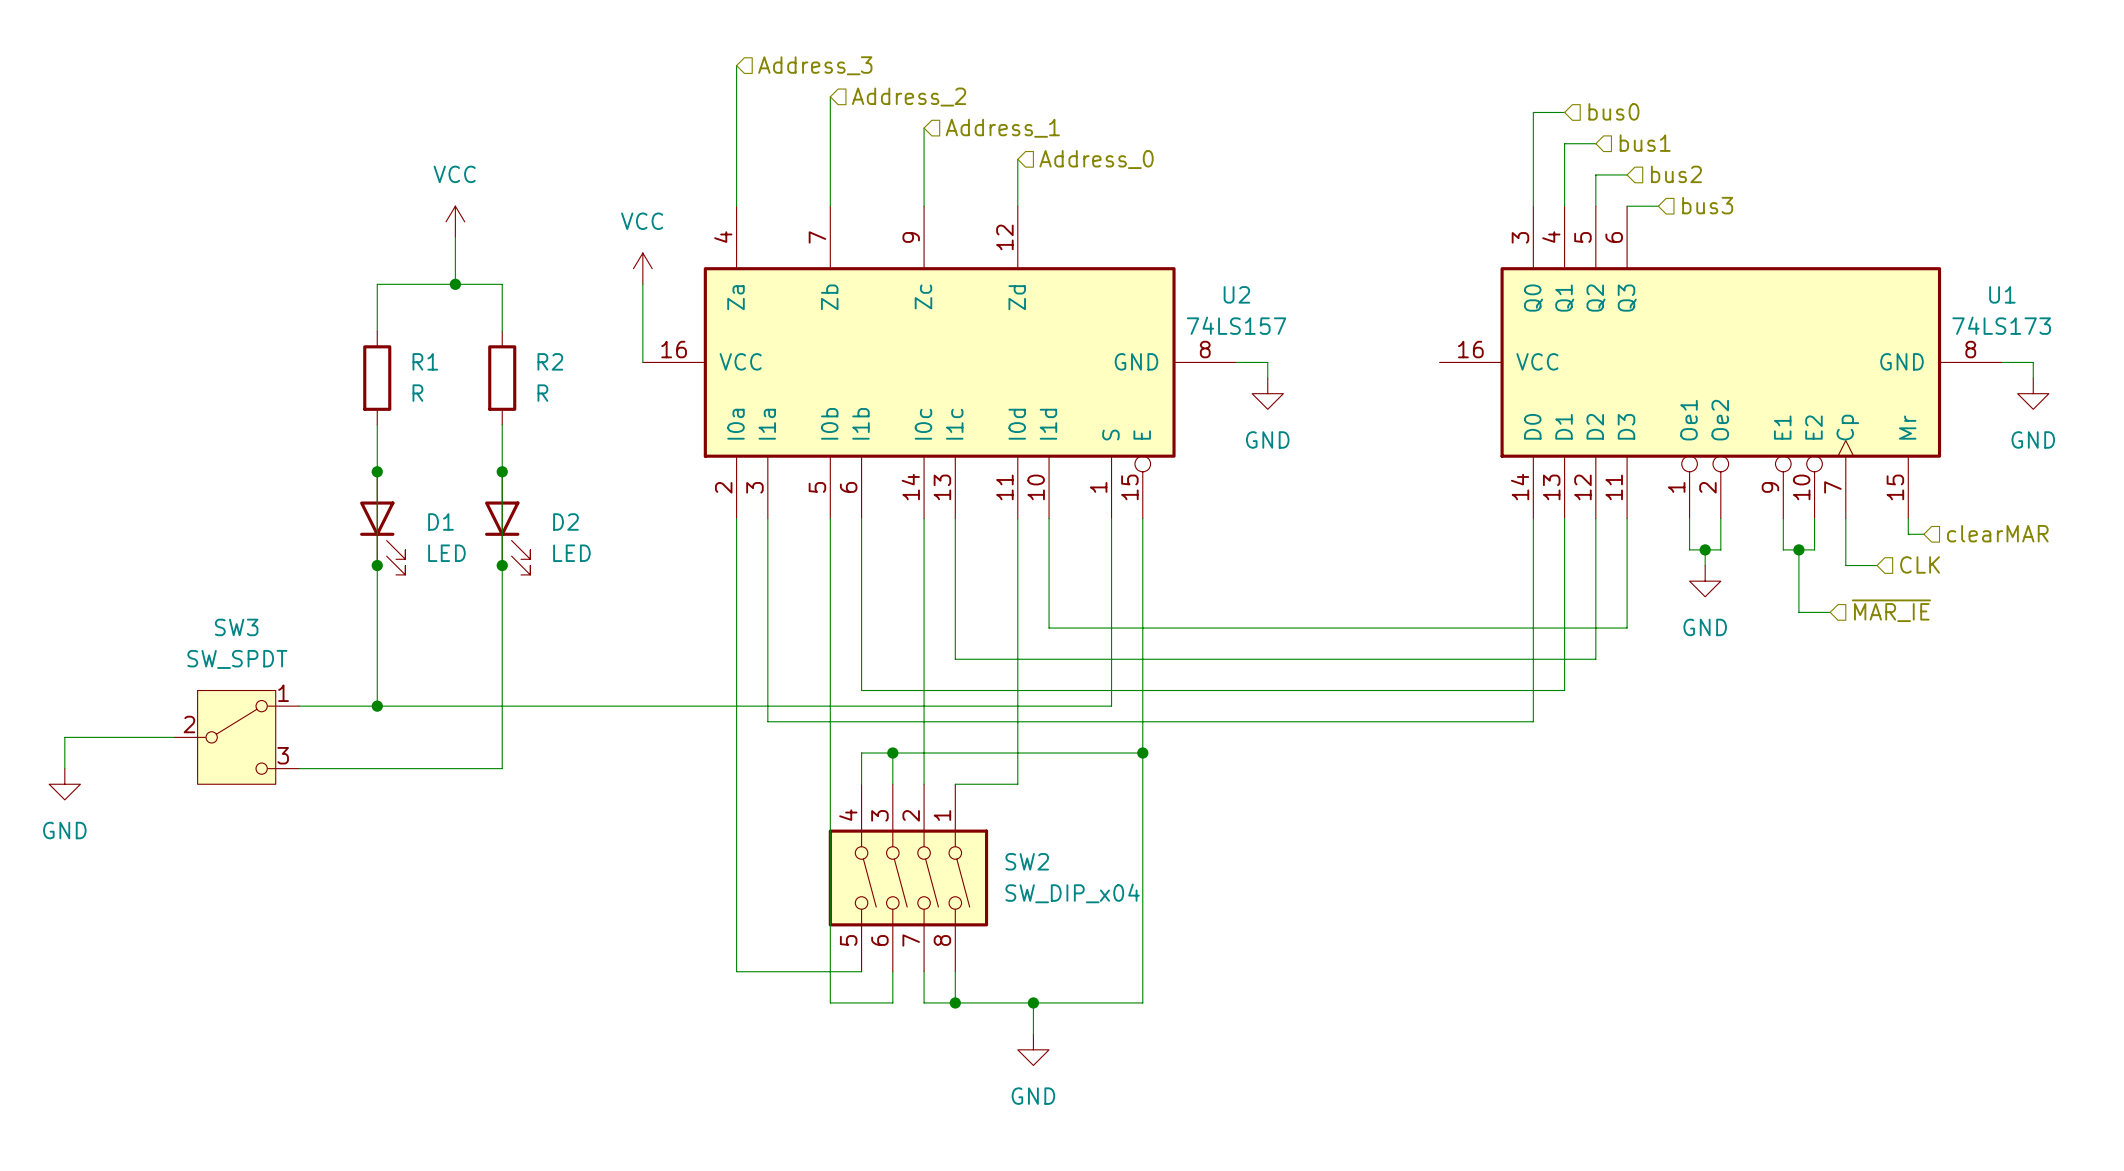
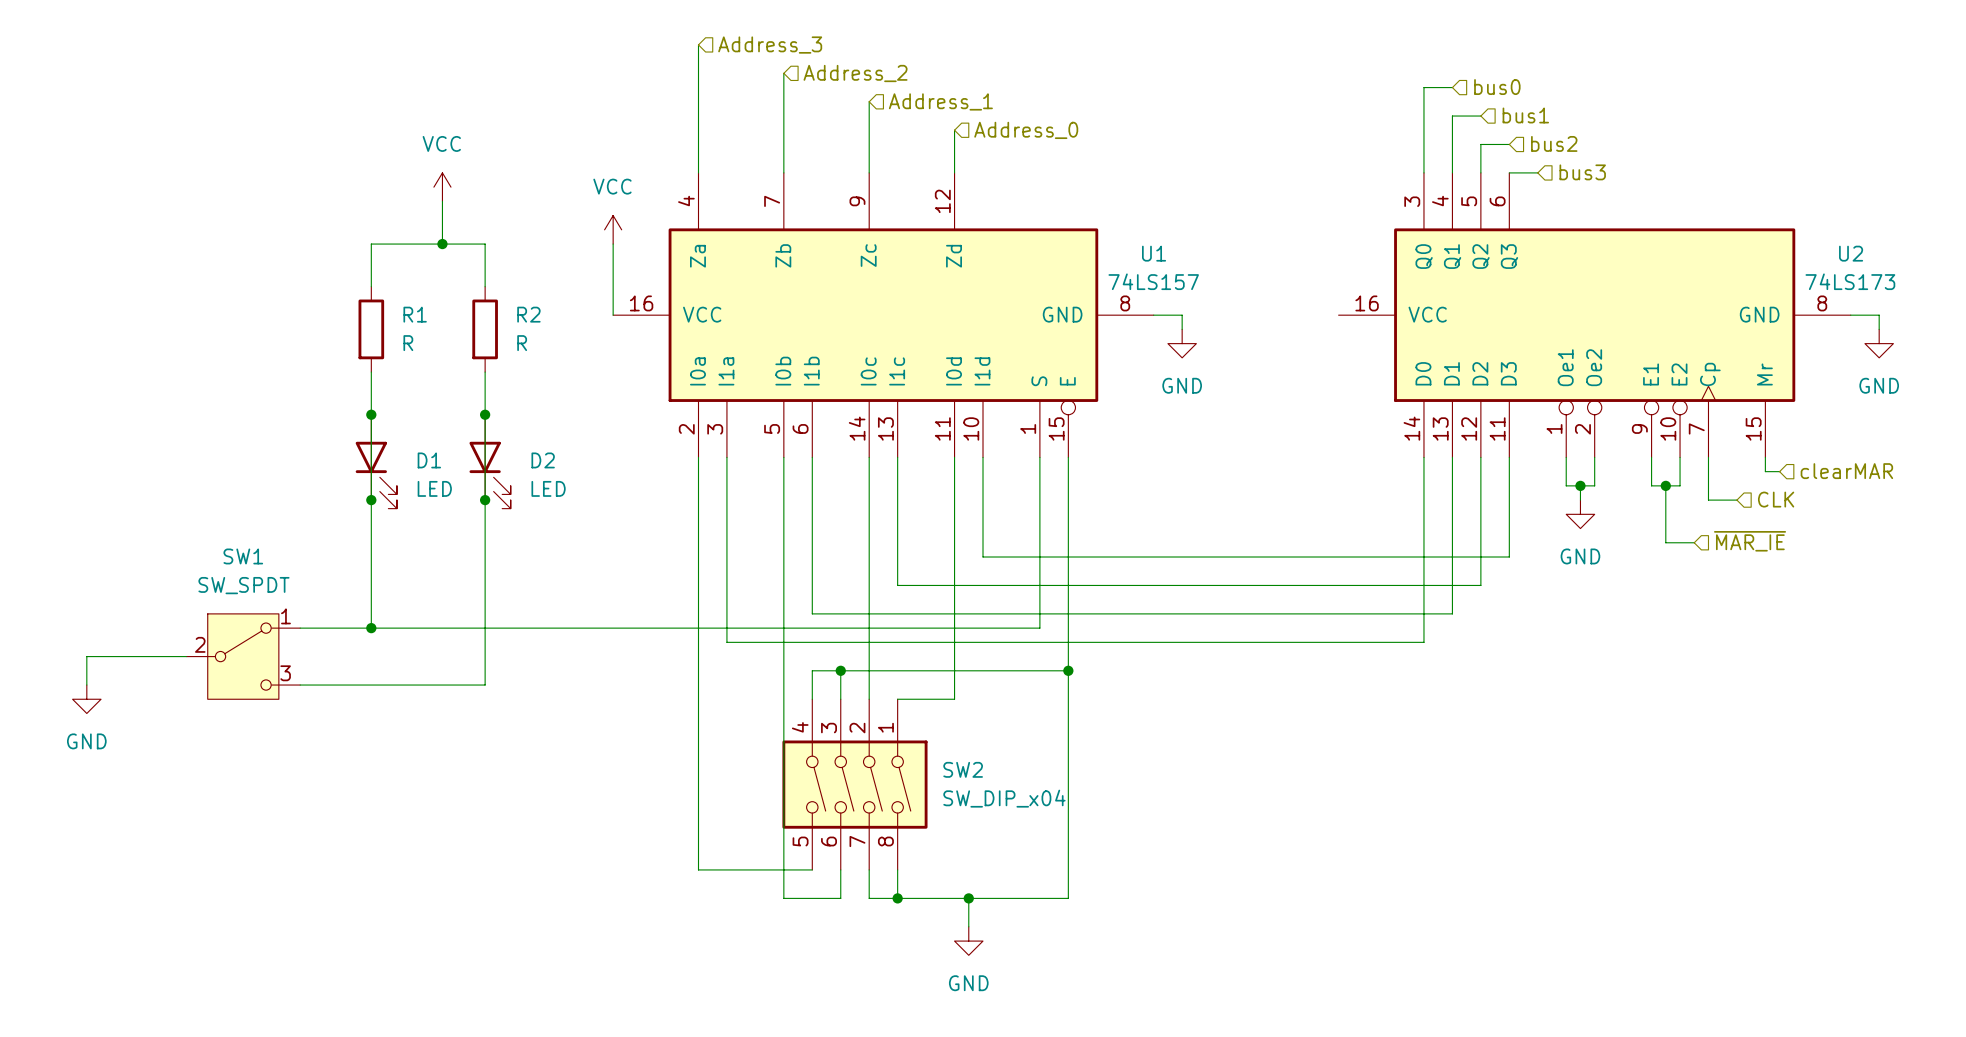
U2 name: U2 (1236, 294) -> U1 (1154, 253)
U1 name: U1 (2002, 294) -> U2 (1851, 253)
SW3 name: SW3 (236, 627) -> SW1 (243, 556)

